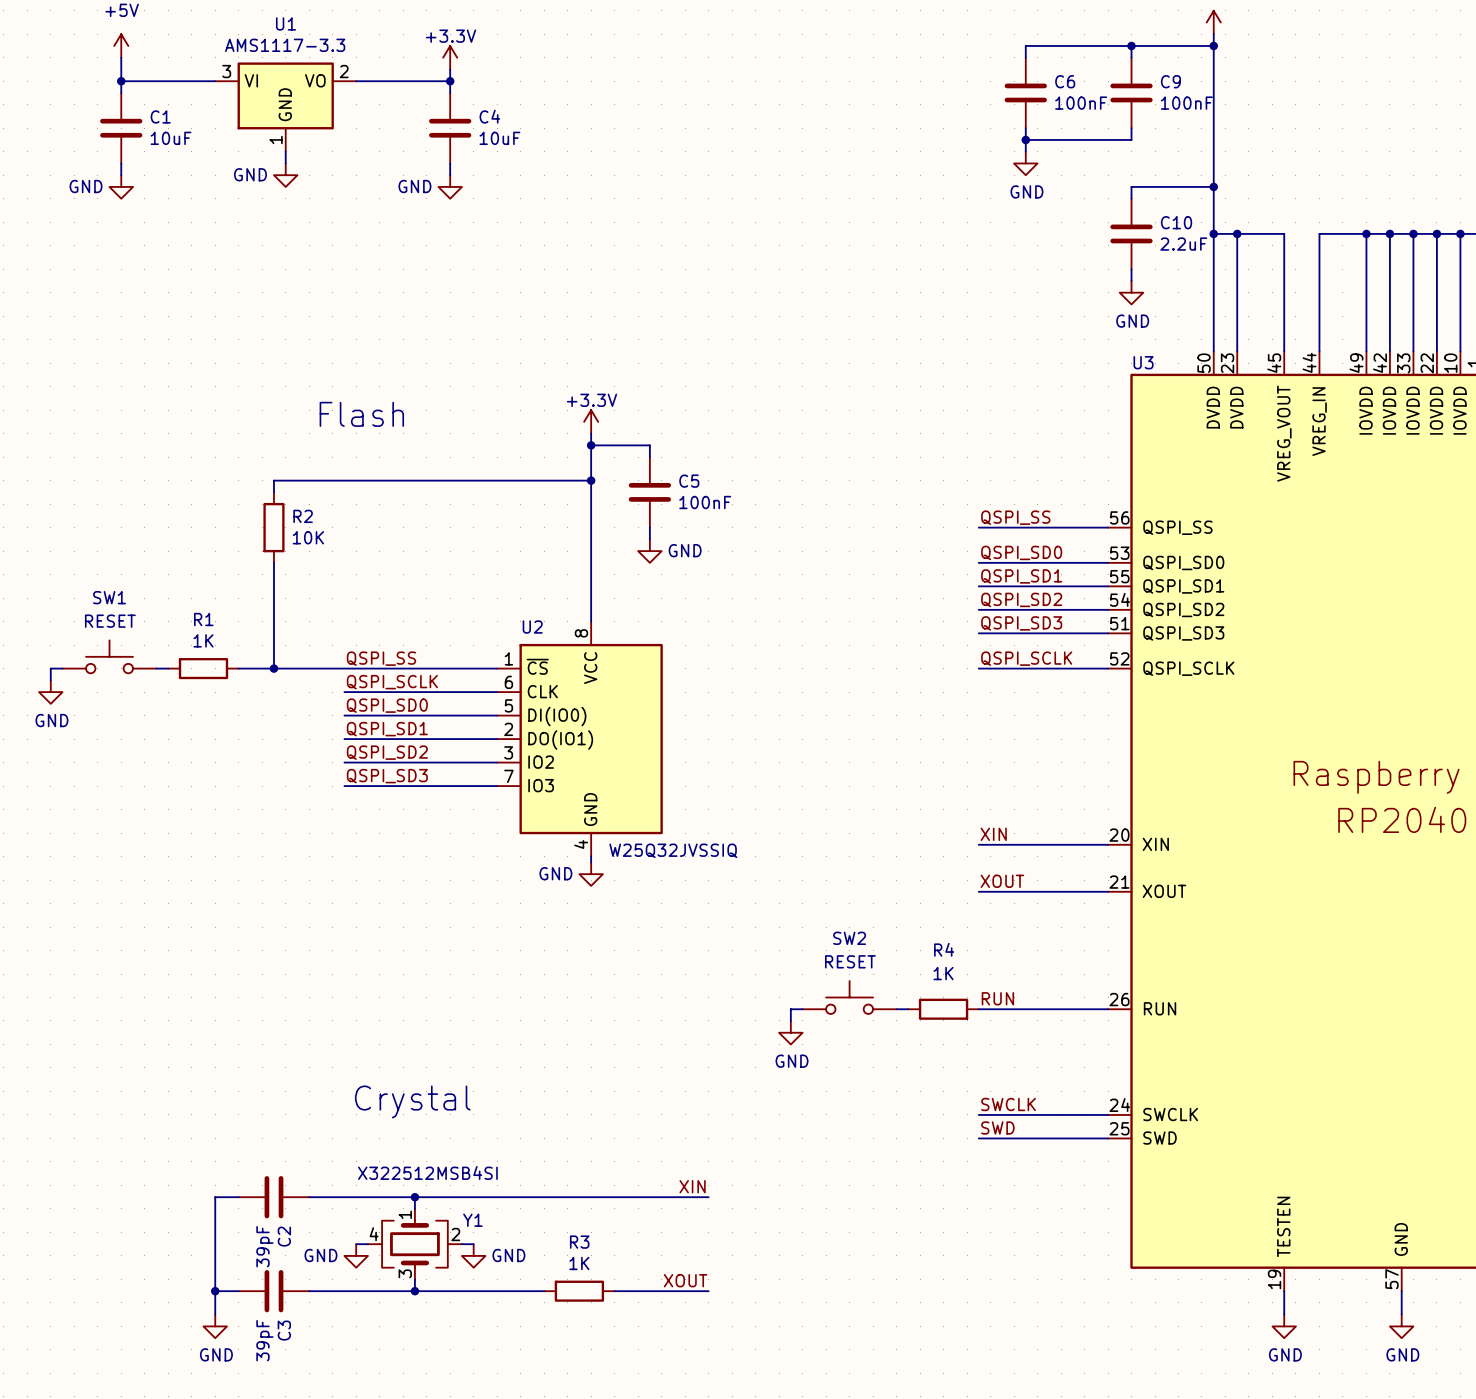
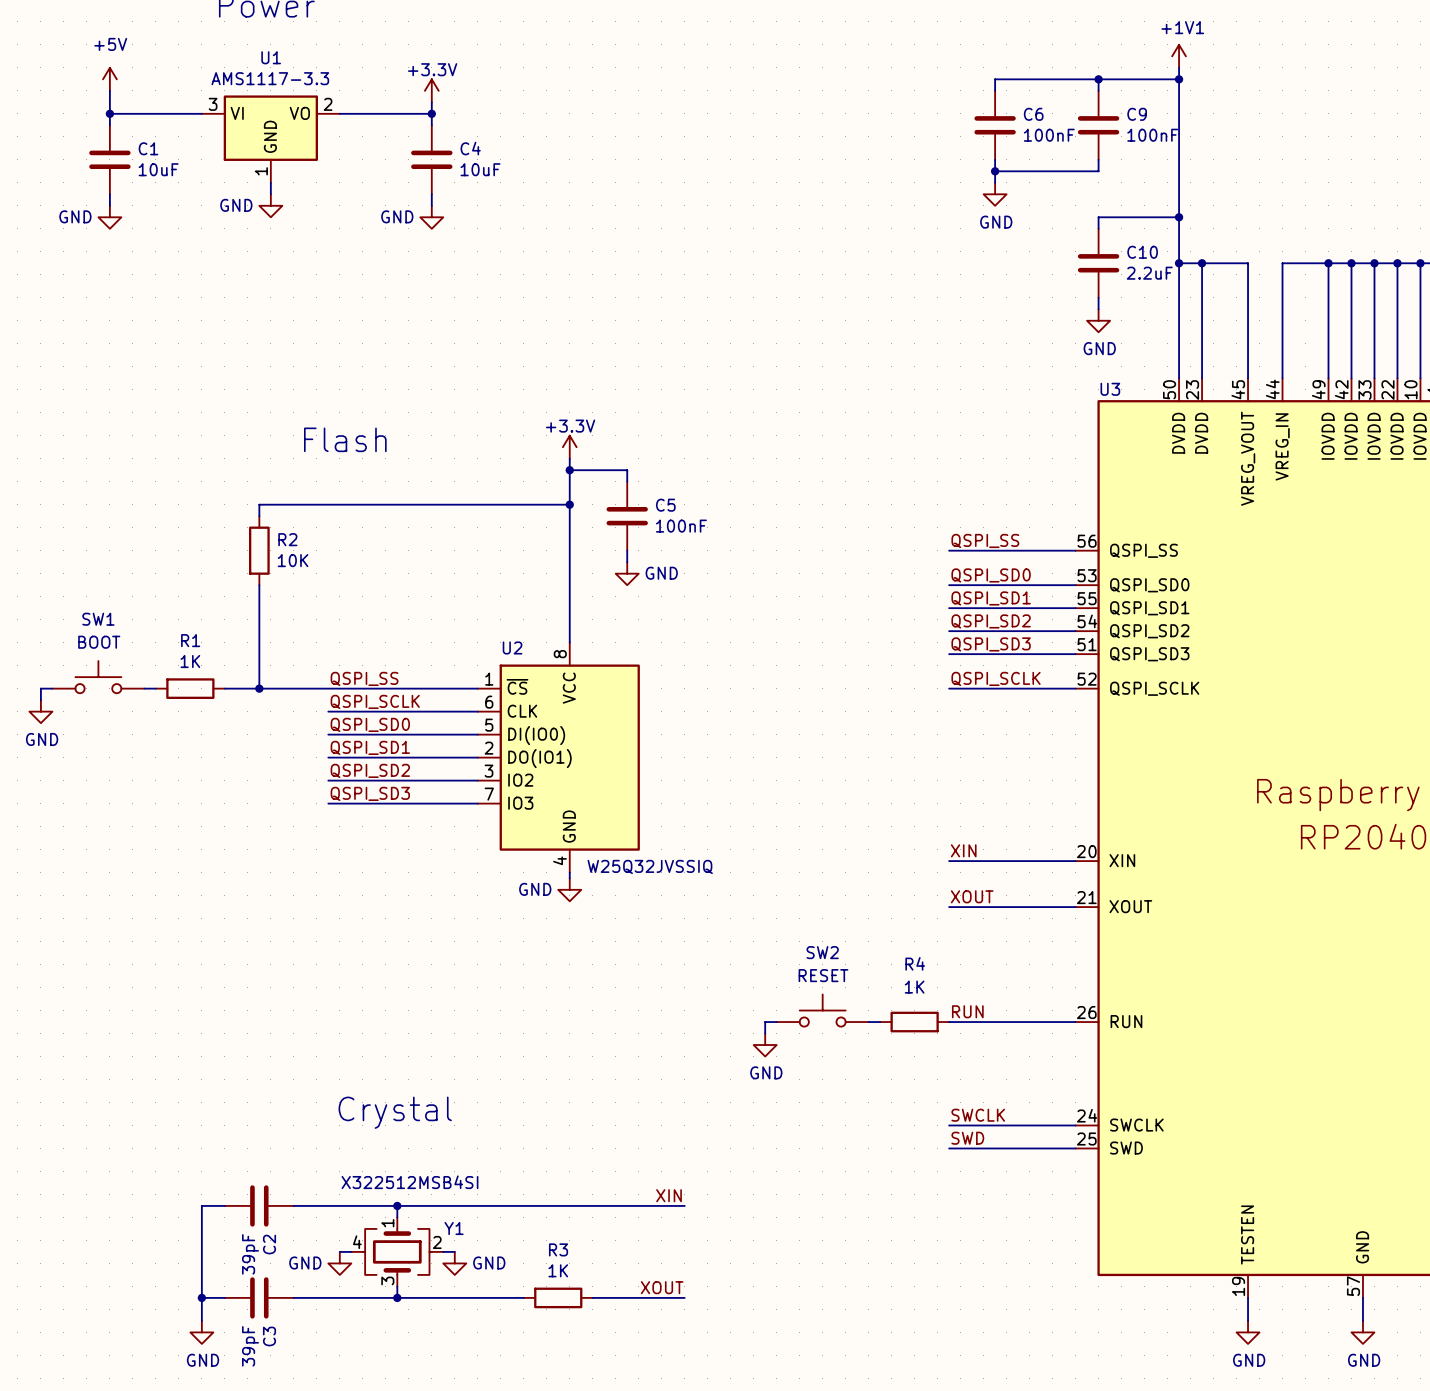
SW1 value: RESET (110, 621) -> BOOT (99, 642)

